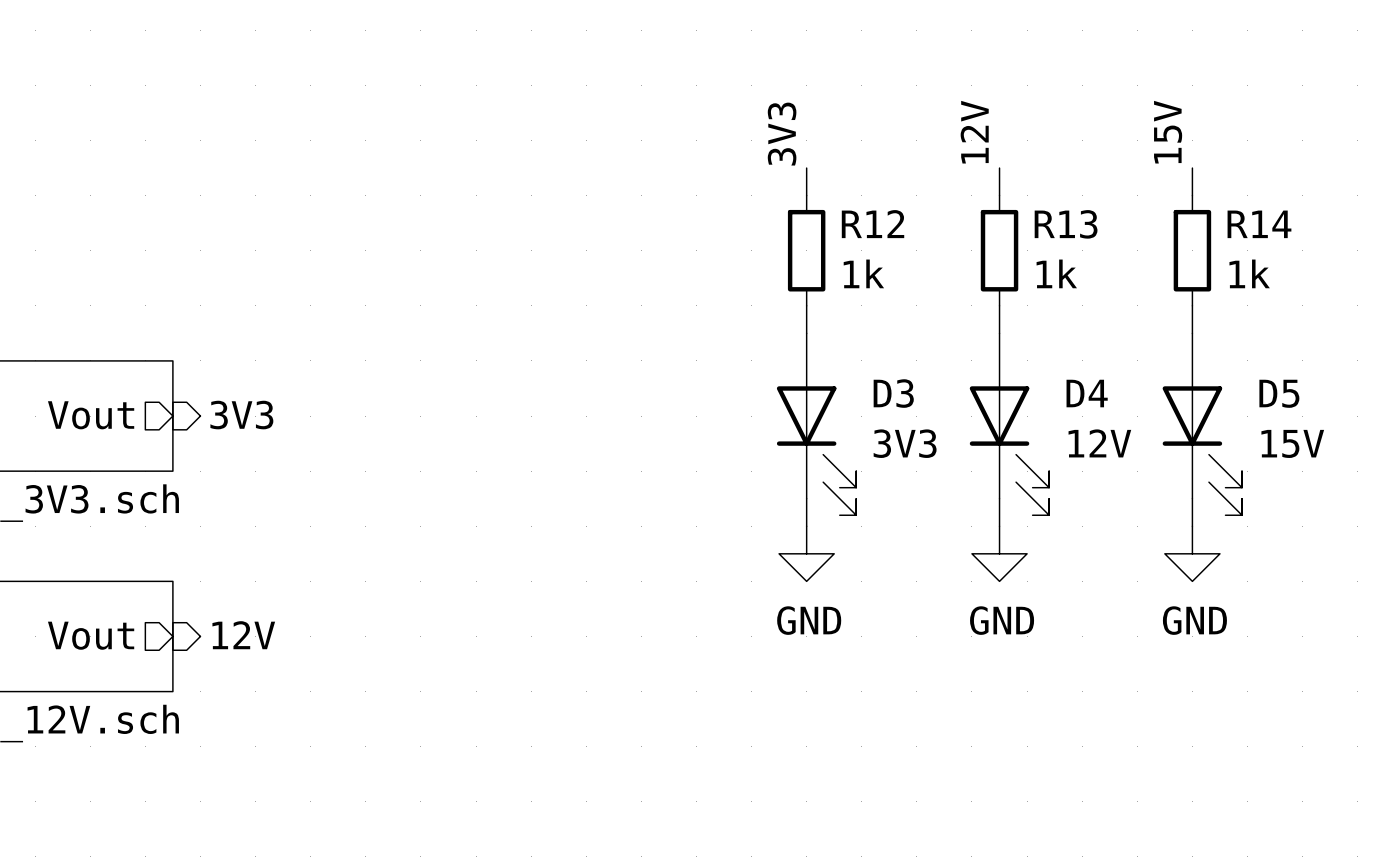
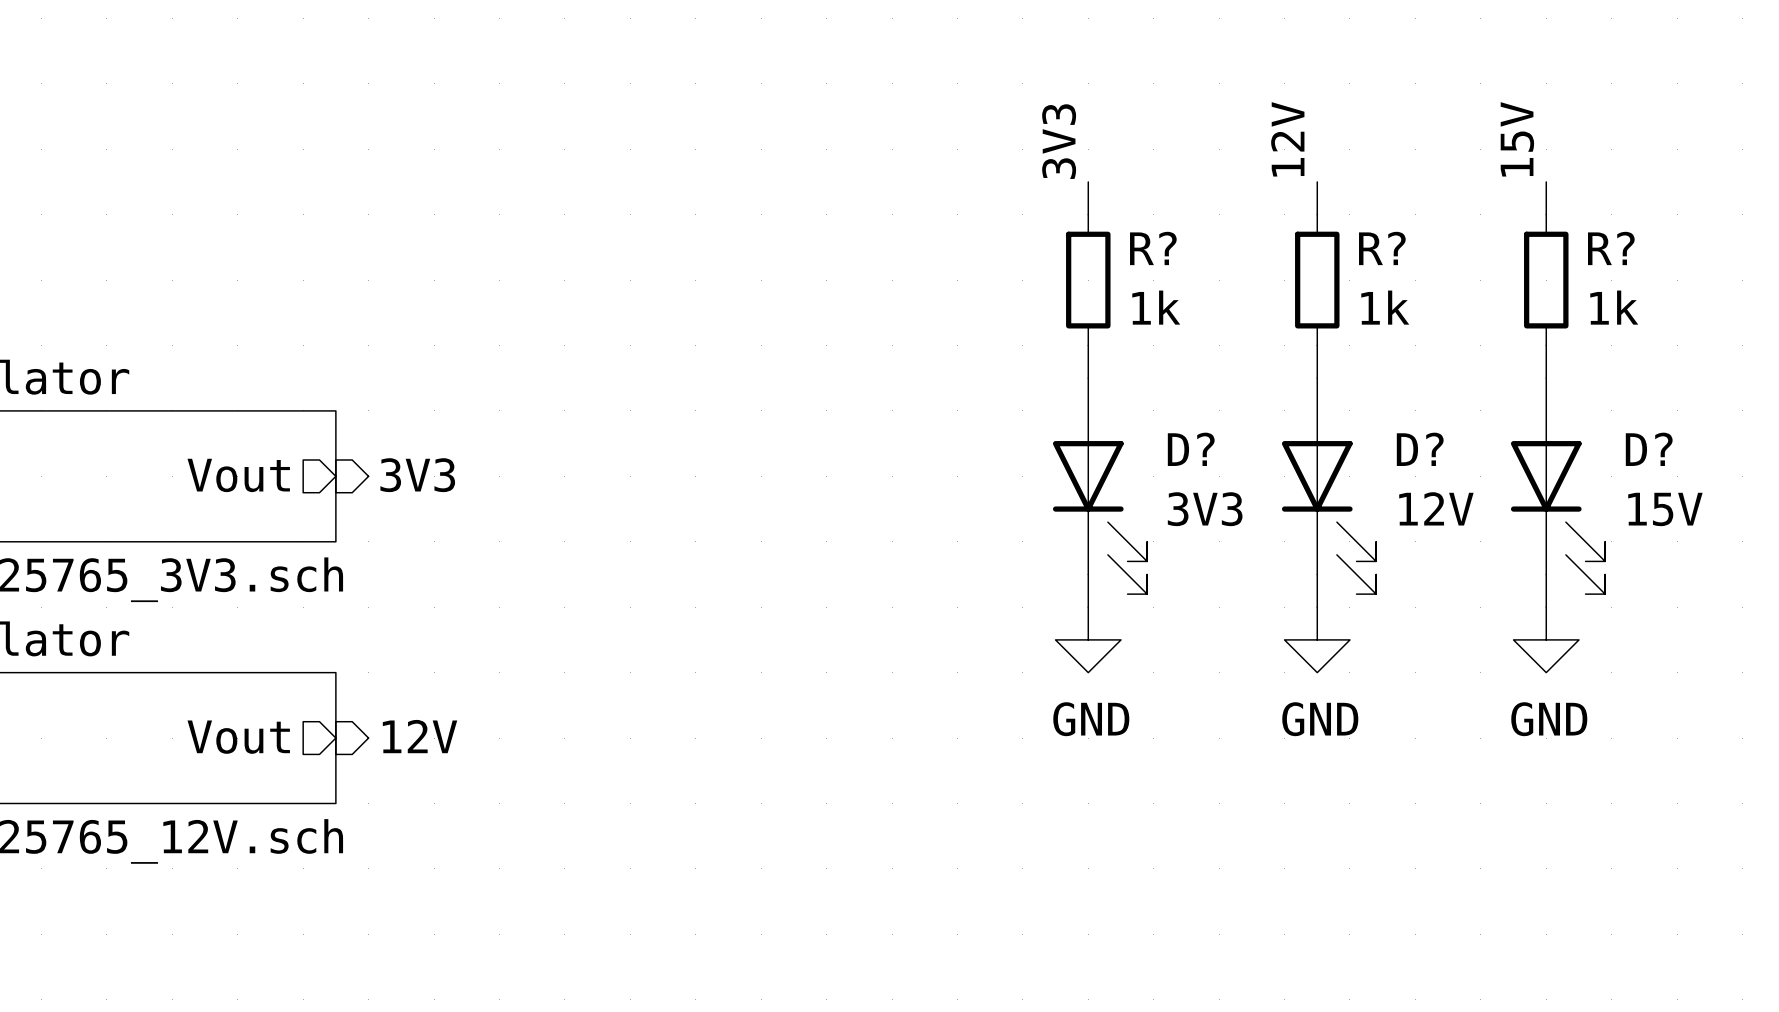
R12 name: R12 (873, 224) -> R? (1153, 248)
R13 name: R13 (1066, 224) -> R? (1382, 248)
R14 name: R14 (1259, 224) -> R? (1611, 248)
D3 name: D3 (893, 393) -> D? (1191, 449)
D4 name: D4 (1087, 393) -> D? (1420, 449)
D5 name: D5 (1279, 393) -> D? (1649, 449)

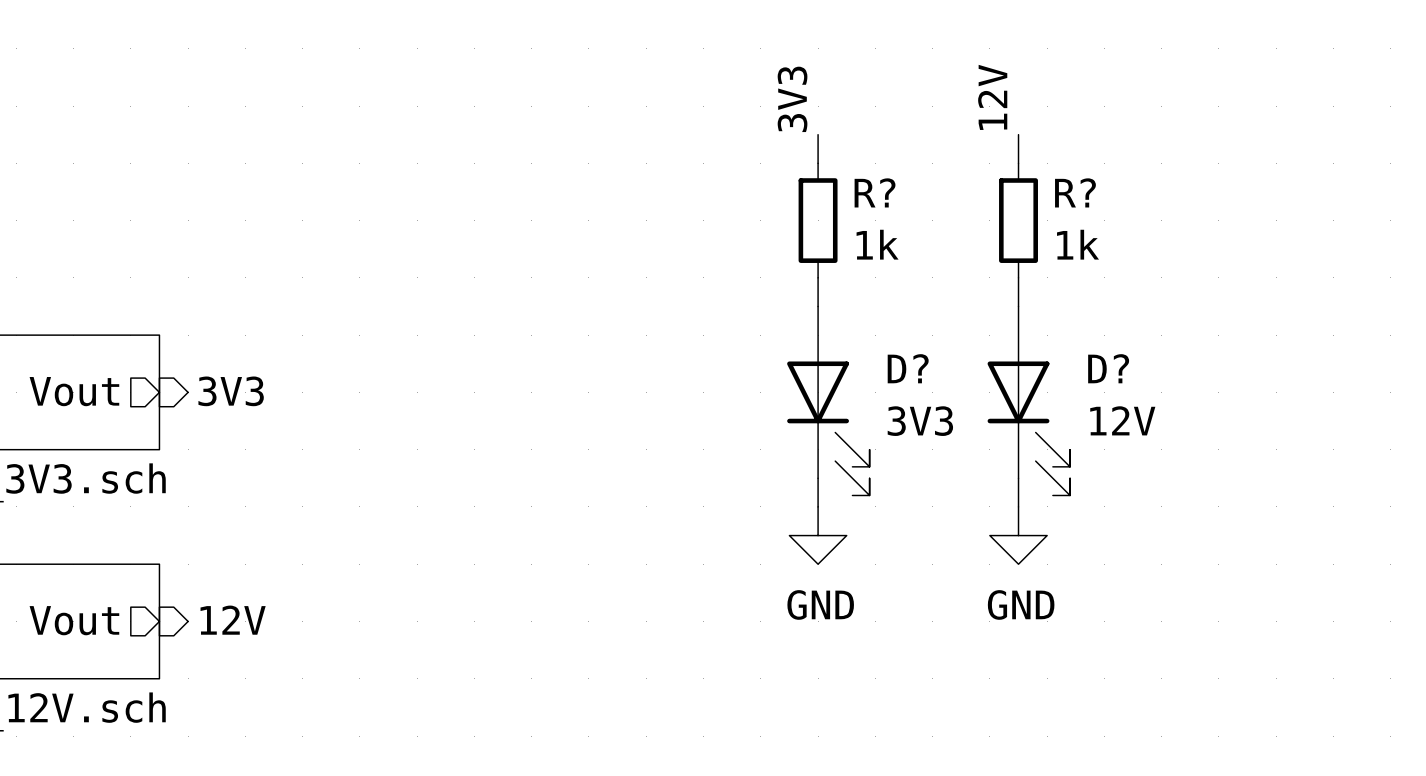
label: 15V (1517, 139) -> none
wire: (1546, 181) (1546, 214) -> none
R?: 1k (1546, 280) -> none
wire: (1546, 345) (1546, 378) -> none
D?: 15V (1558, 486) -> none
wire: (1546, 574) (1546, 607) -> none
power symbol: GND (1546, 639) -> none

